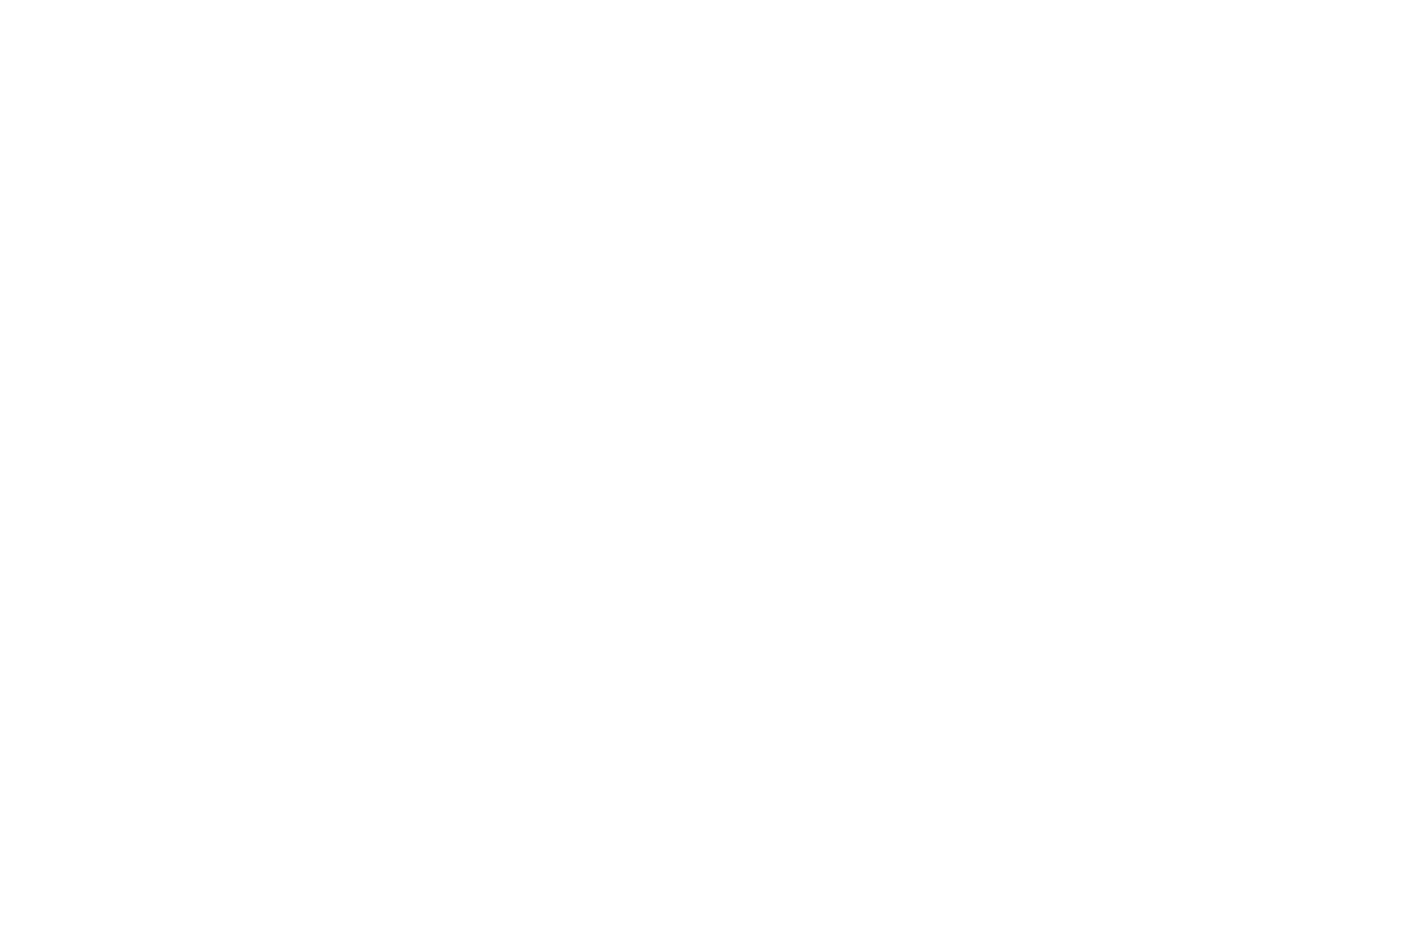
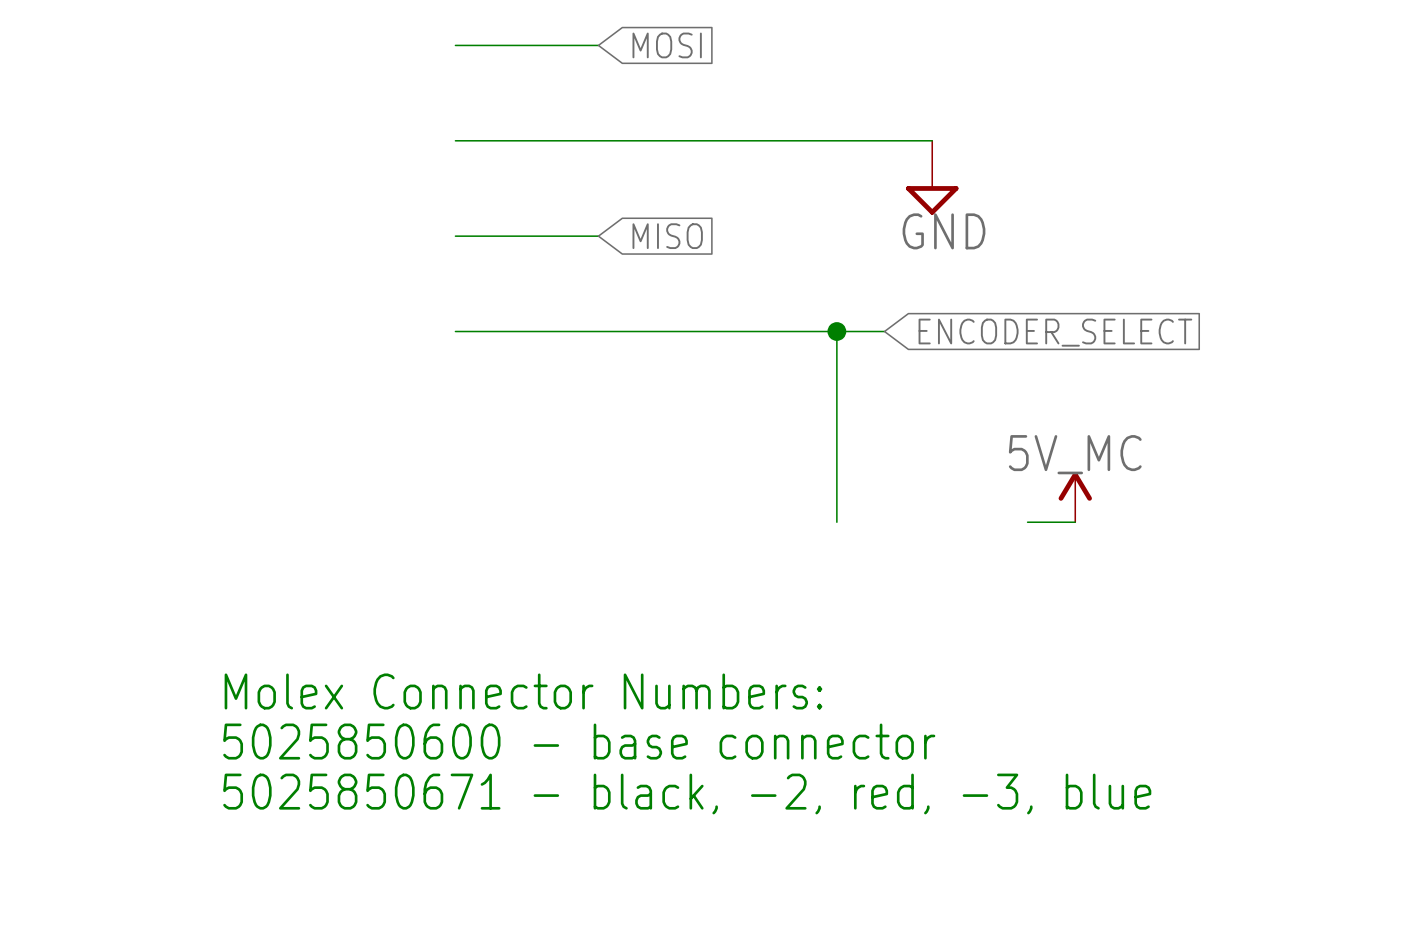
wire: none -> (455, 45) (598, 45)
global label: none -> MOSI (667, 45)
wire: none -> (455, 140) (932, 140)
power symbol: none -> GND (932, 177)
wire: none -> (455, 236) (598, 236)
global label: none -> MISO (667, 236)
wire: none -> (455, 331) (884, 331)
wire: none -> (836, 331) (836, 522)
junction: none -> (836, 331)
global label: none -> ENCODER_SELECT (1055, 332)
power symbol: none -> 5V_MC (1075, 497)
wire: none -> (1027, 522) (1075, 522)
text: none -> Molex Connector Numbers: (523, 691)
text: none -> 5025850600 - base connector (579, 741)
text: none -> 5025850671 - black, -2, red, -3, blue (687, 793)

